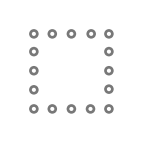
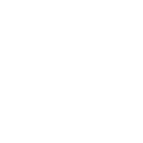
via: (33, 33) -> none
via: (52, 33) -> none
via: (71, 33) -> none
via: (91, 33) -> none
via: (108, 33) -> none
via: (33, 51) -> none
via: (108, 51) -> none
via: (33, 70) -> none
via: (108, 70) -> none
via: (33, 89) -> none
via: (108, 89) -> none
via: (33, 108) -> none
via: (52, 108) -> none
via: (71, 108) -> none
via: (90, 108) -> none
via: (108, 108) -> none

